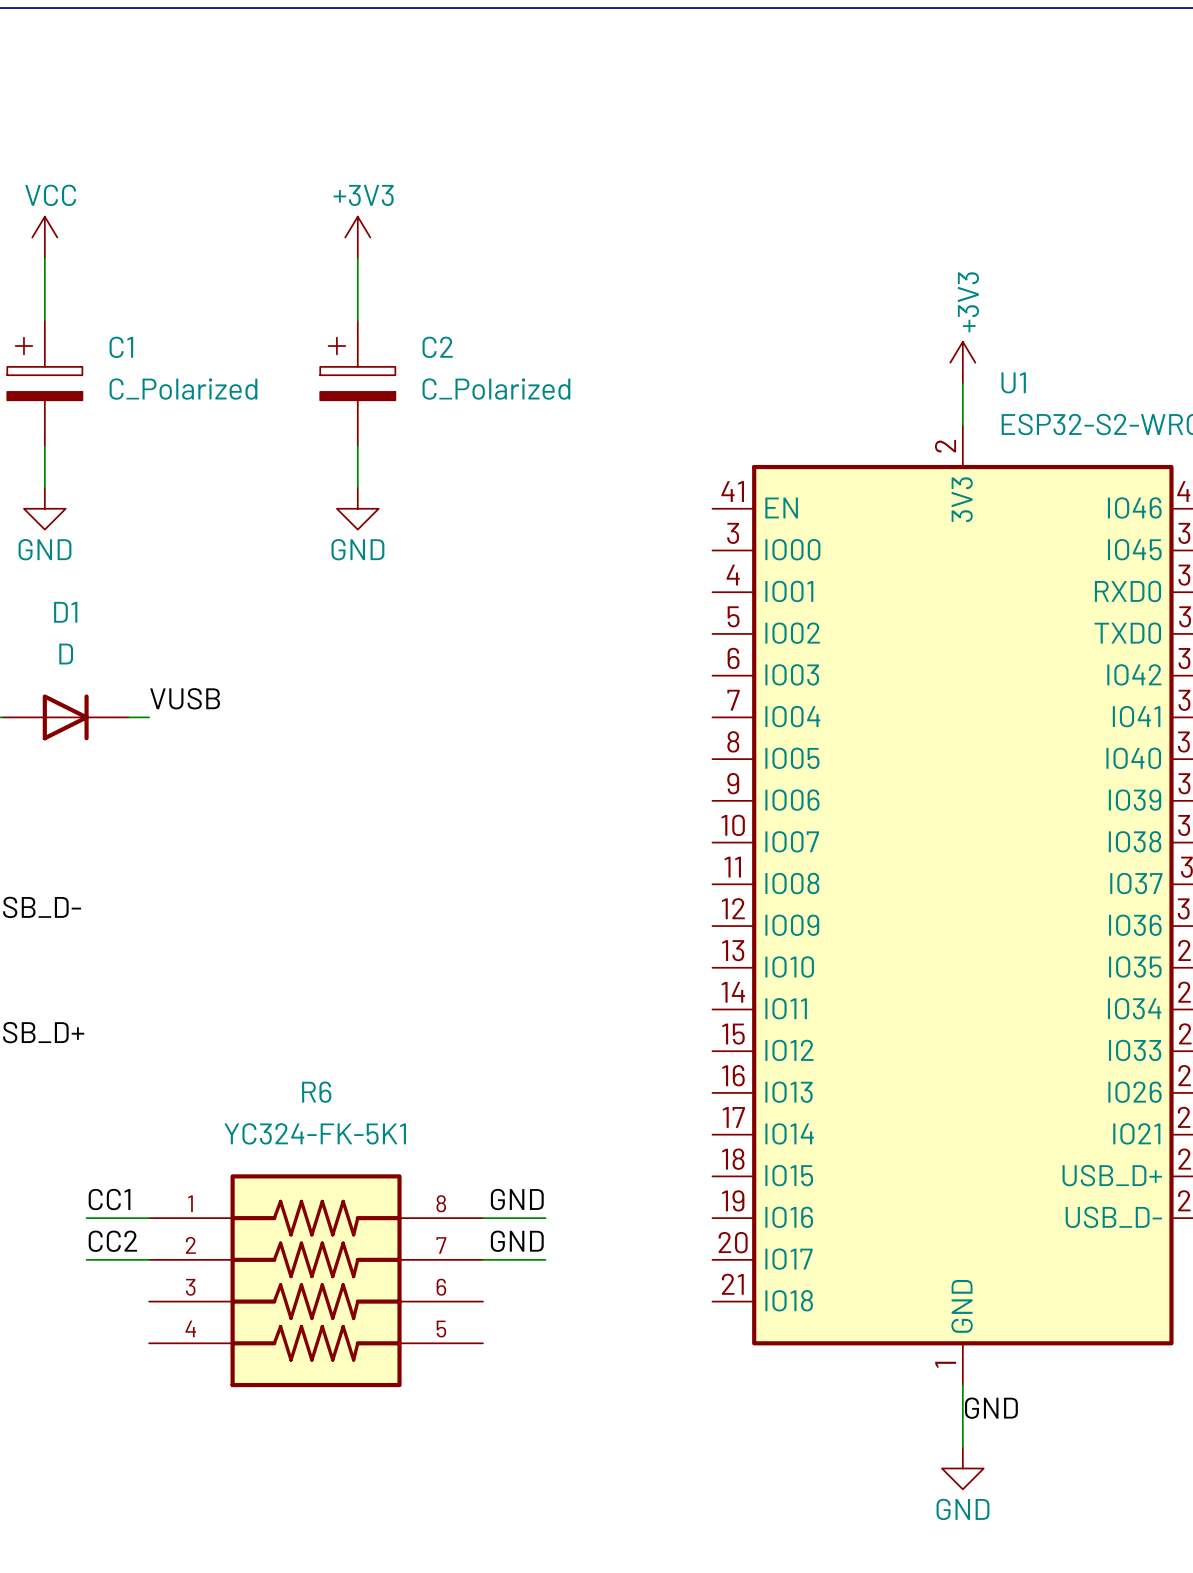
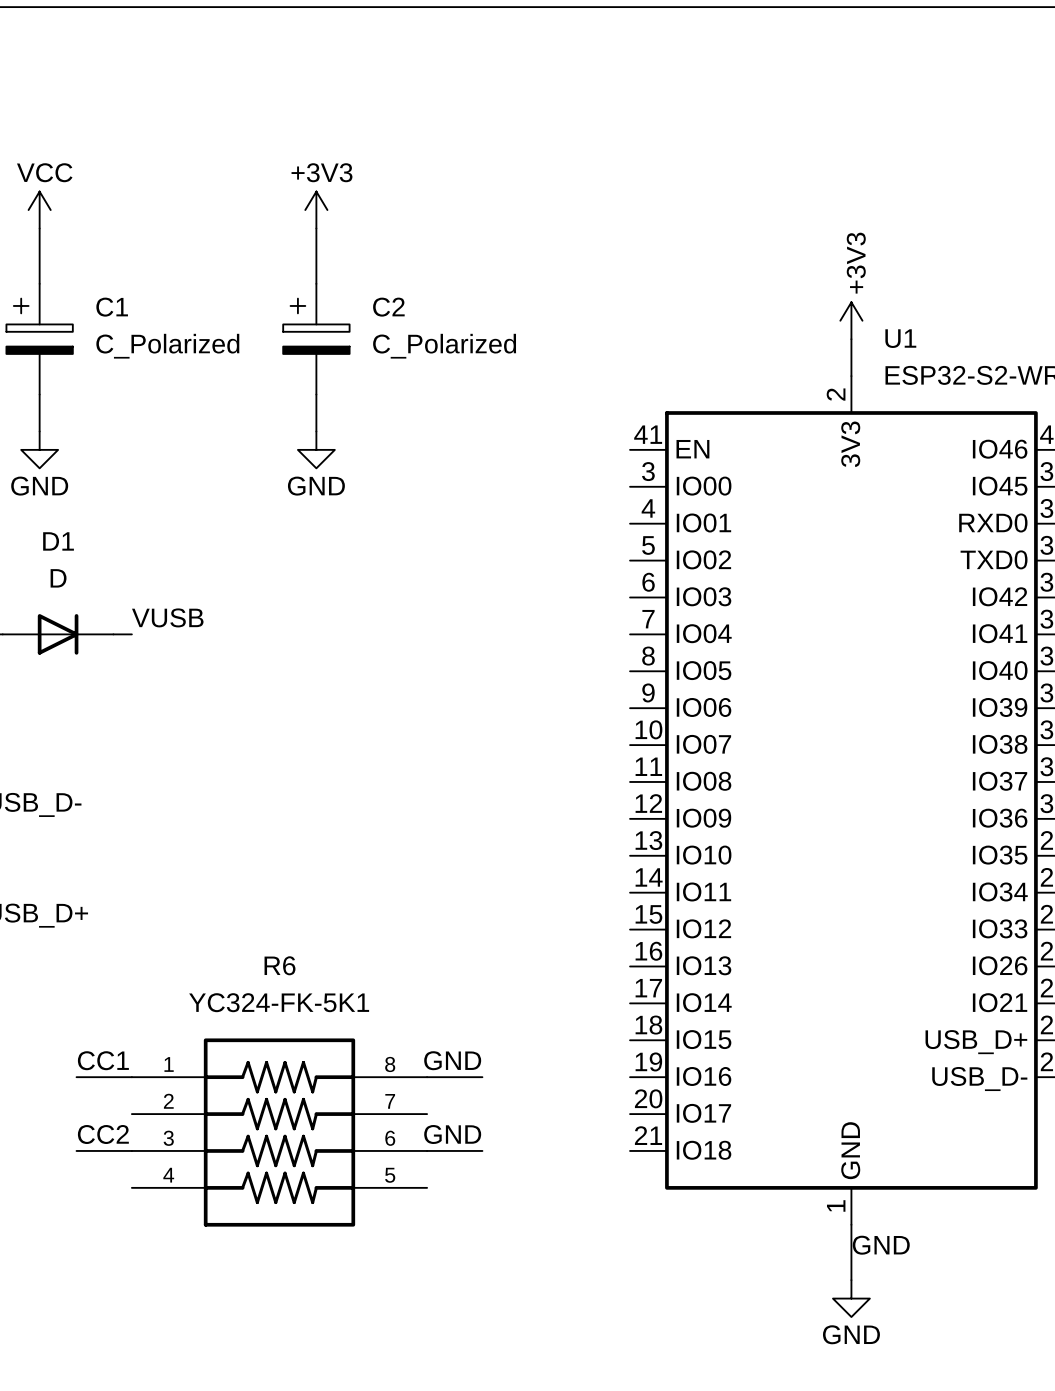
label position: CC2 (112, 1241) -> CC2 (103, 1134)
label position: GND (517, 1241) -> GND (452, 1134)
wire: (86, 1259) (149, 1259) -> (76, 1150) (131, 1150)
wire: (482, 1259) (545, 1259) -> (427, 1150) (482, 1150)

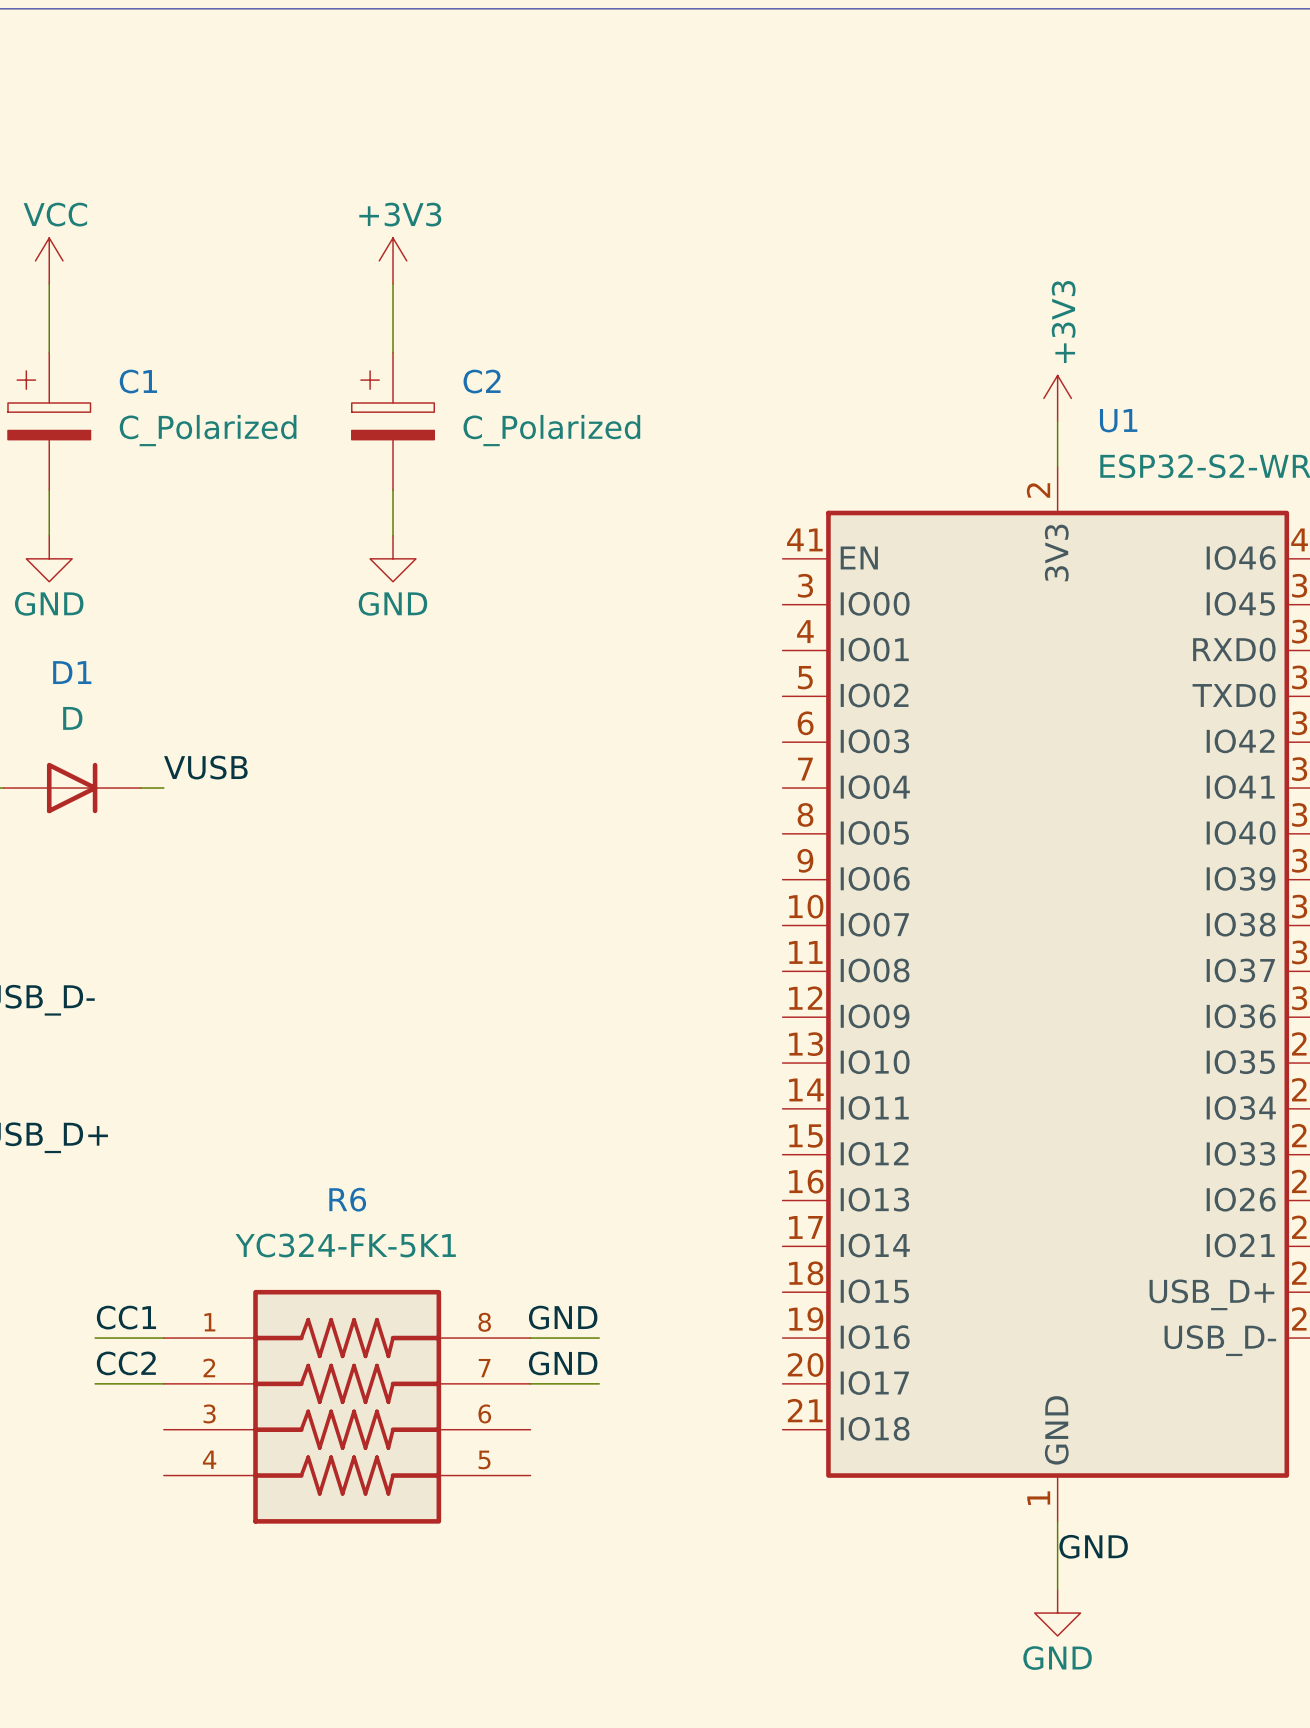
label position: CC2 (103, 1134) -> CC2 (126, 1363)
label position: GND (452, 1134) -> GND (563, 1363)
wire: (76, 1150) (131, 1150) -> (95, 1383) (163, 1383)
wire: (427, 1150) (482, 1150) -> (530, 1383) (599, 1383)

